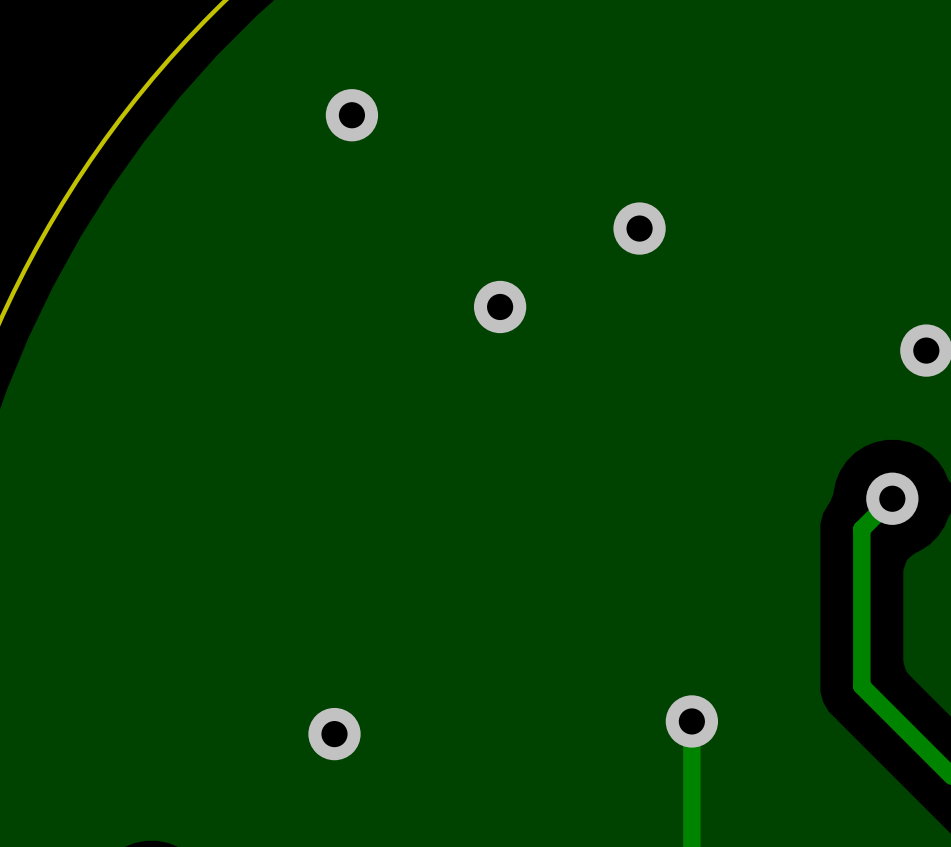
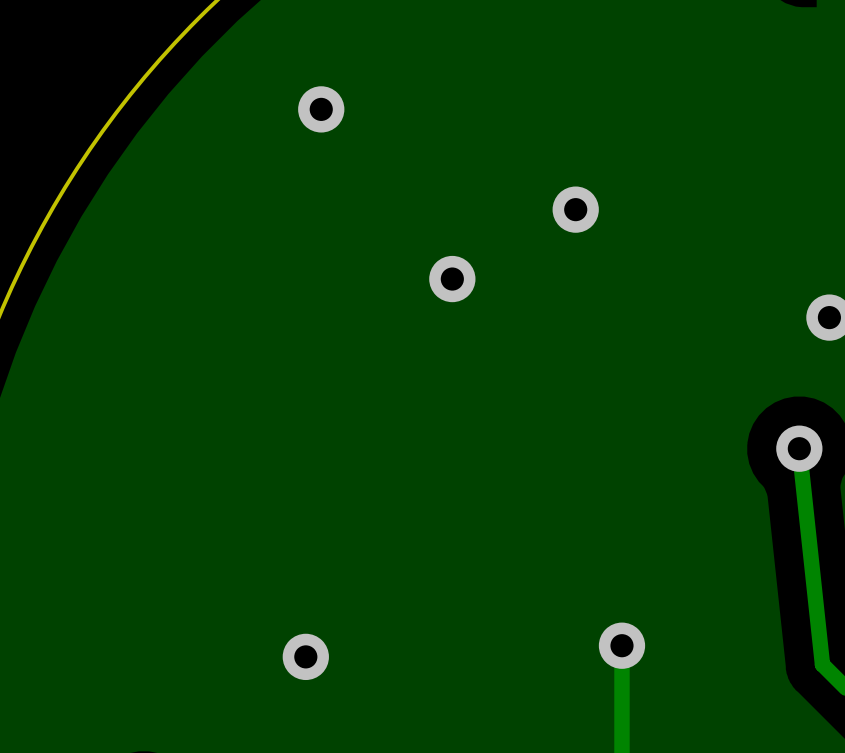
track: (892, 498) (861, 529) (861, 686) (918, 742) -> (799, 448) (822, 664)

